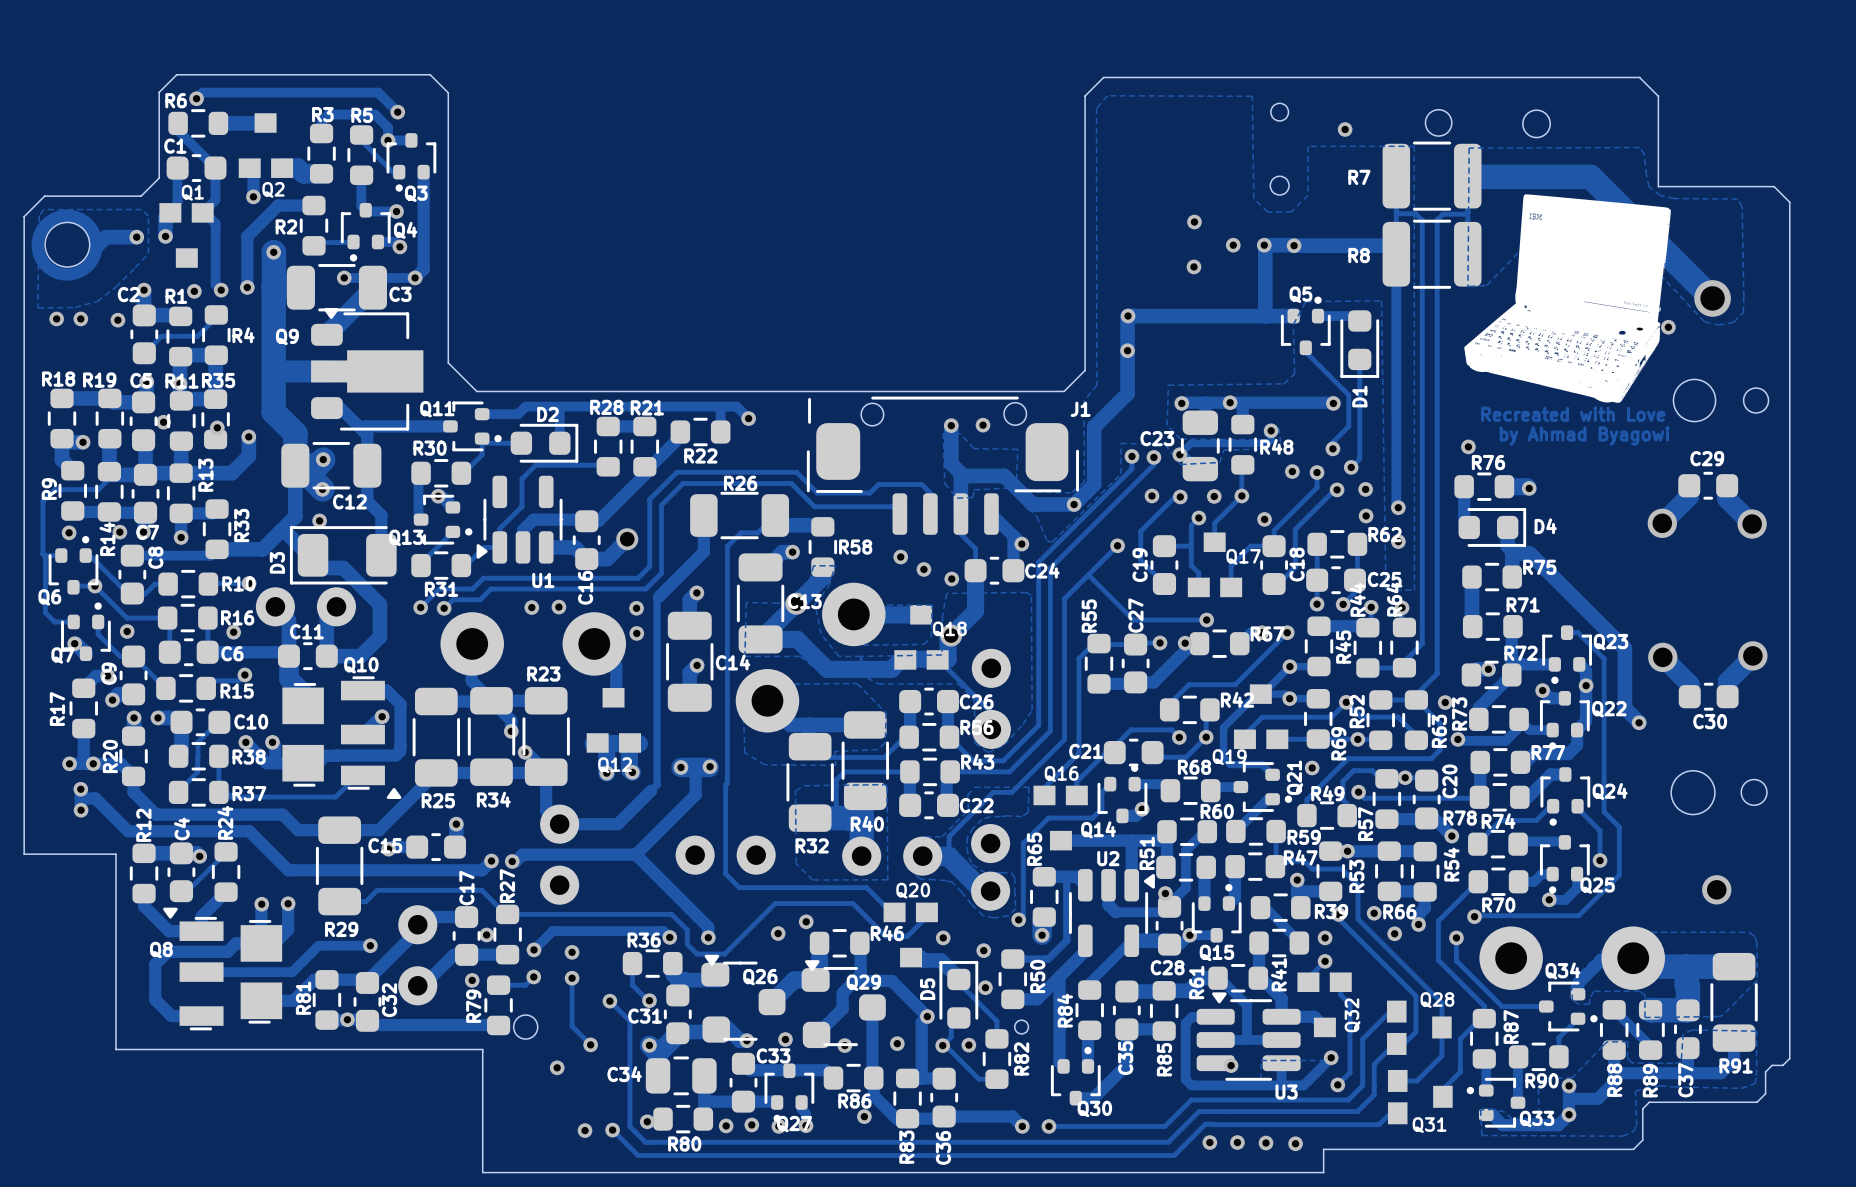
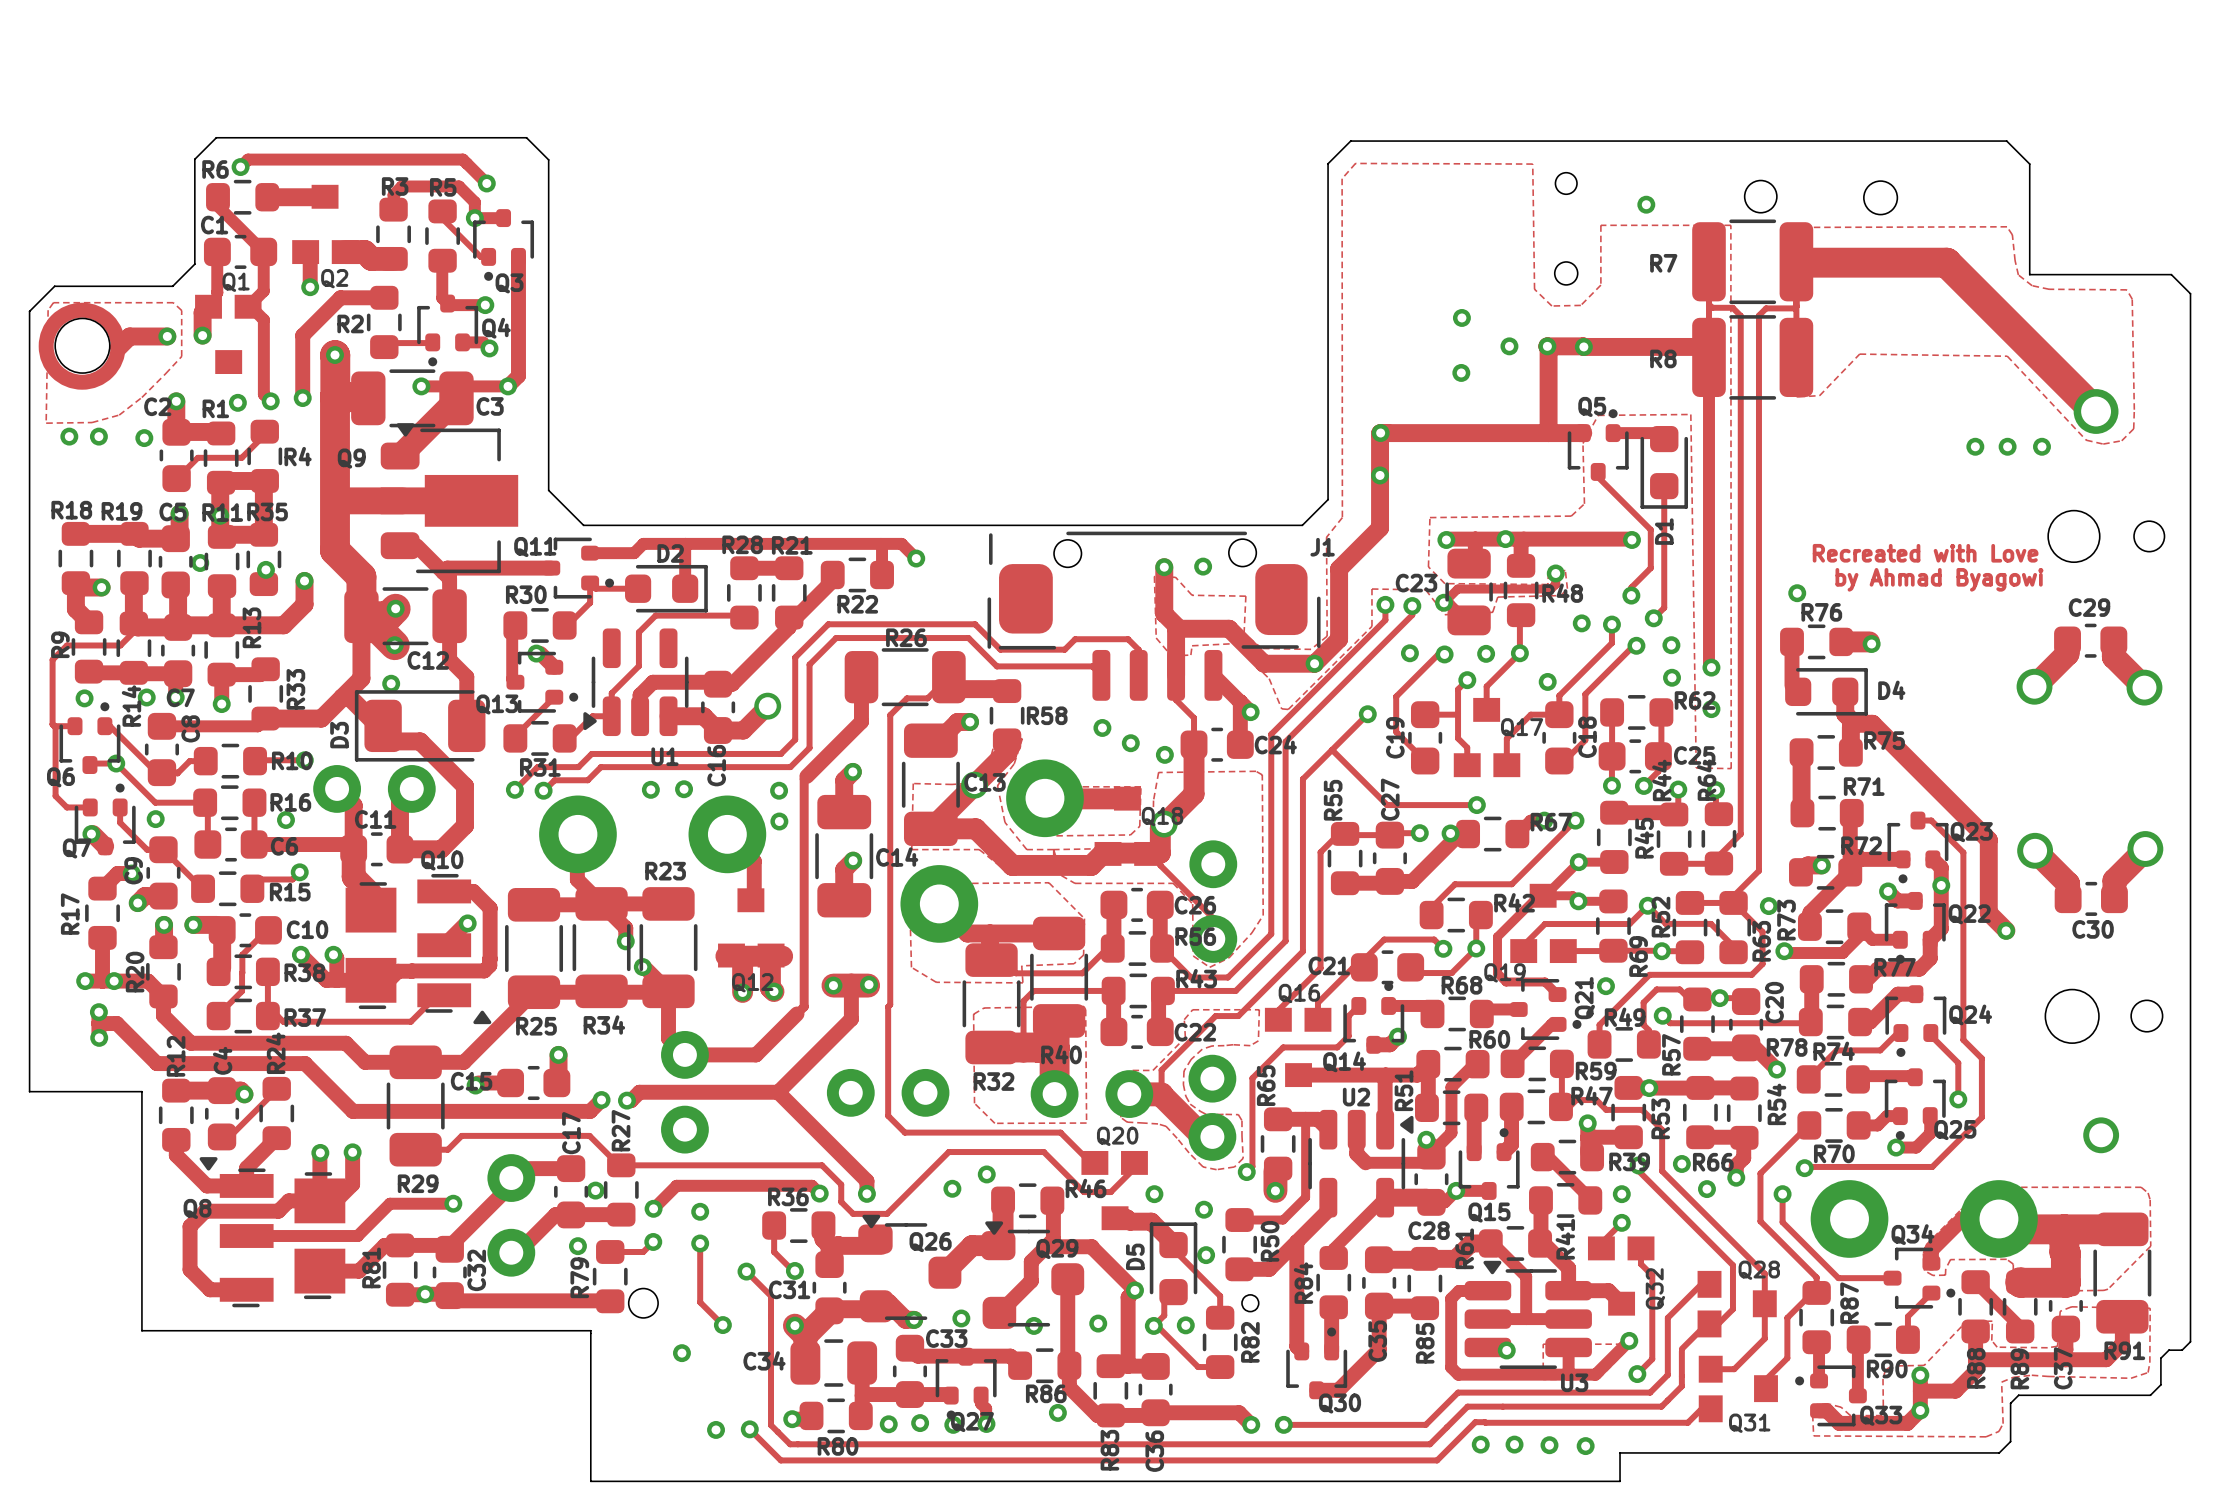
part: (1567, 298) -> none

